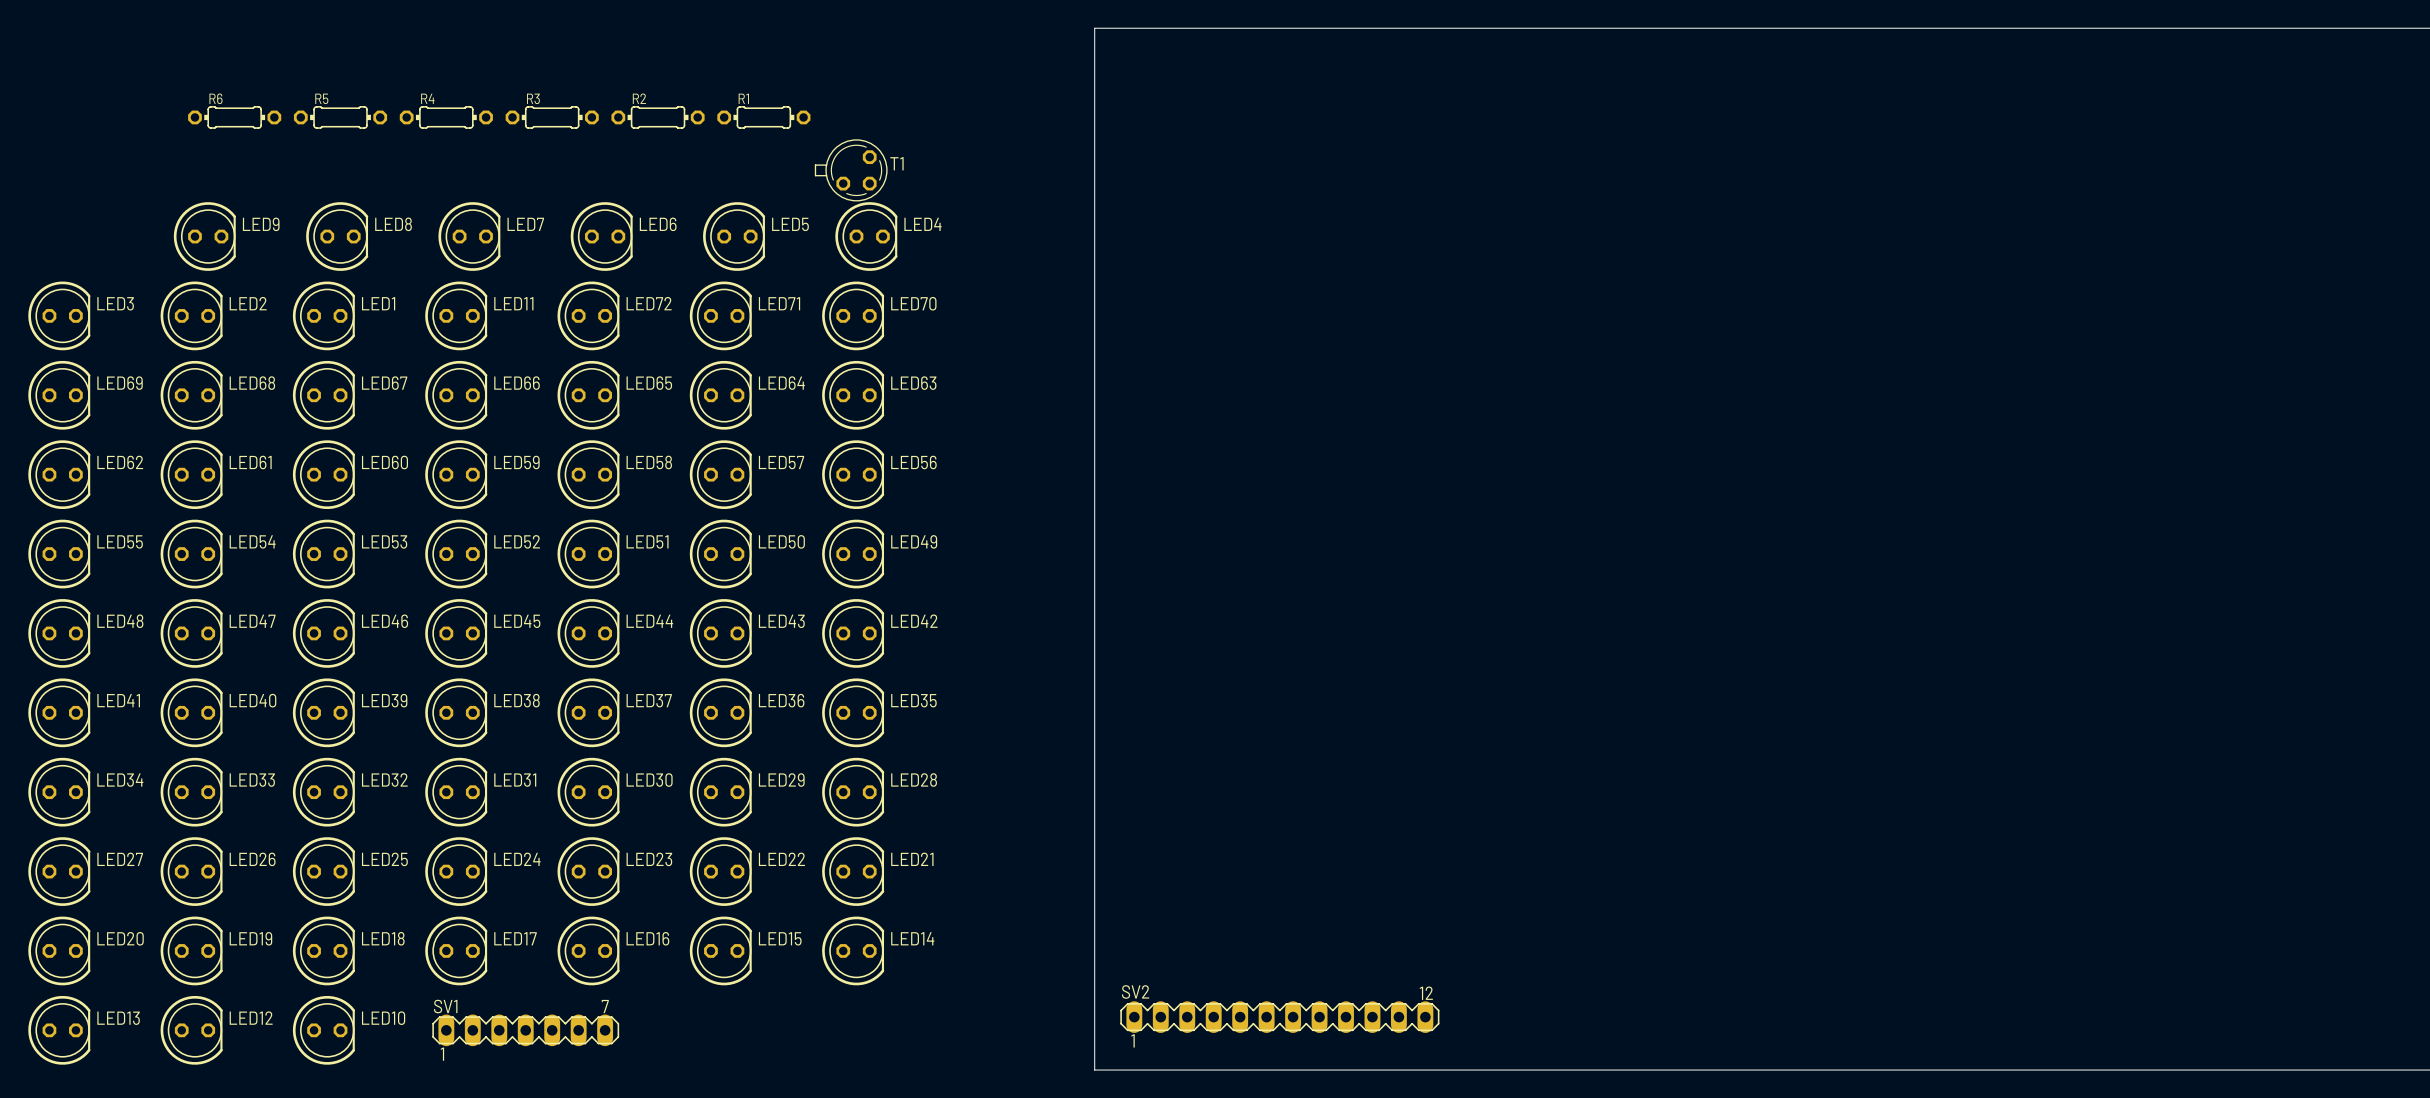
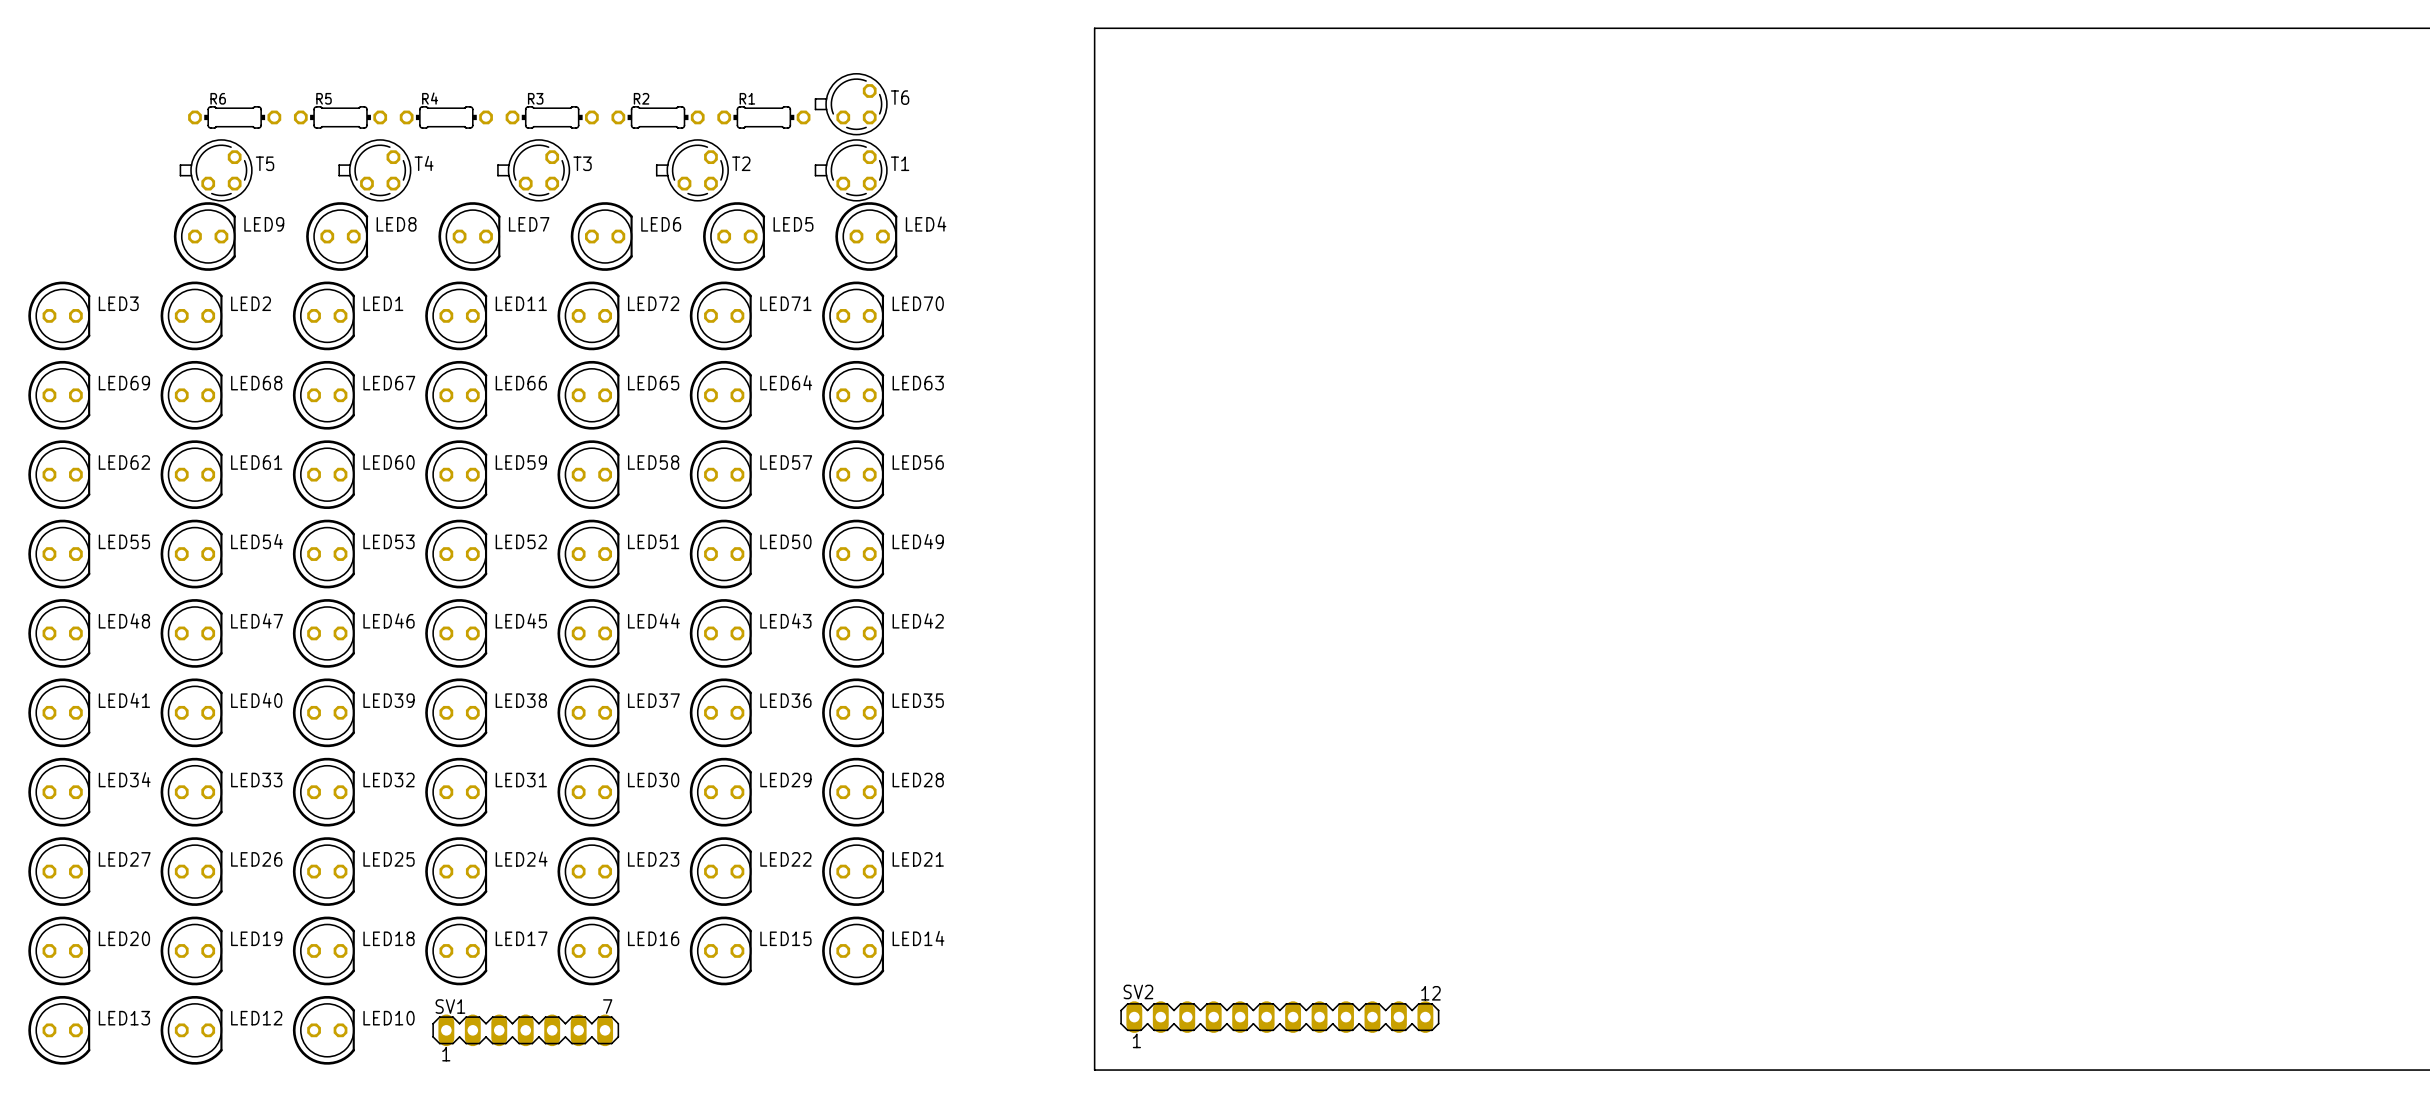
T6: none -> (851, 104)
T5: none -> (216, 170)
T4: none -> (374, 170)
T3: none -> (533, 170)
T2: none -> (692, 170)

